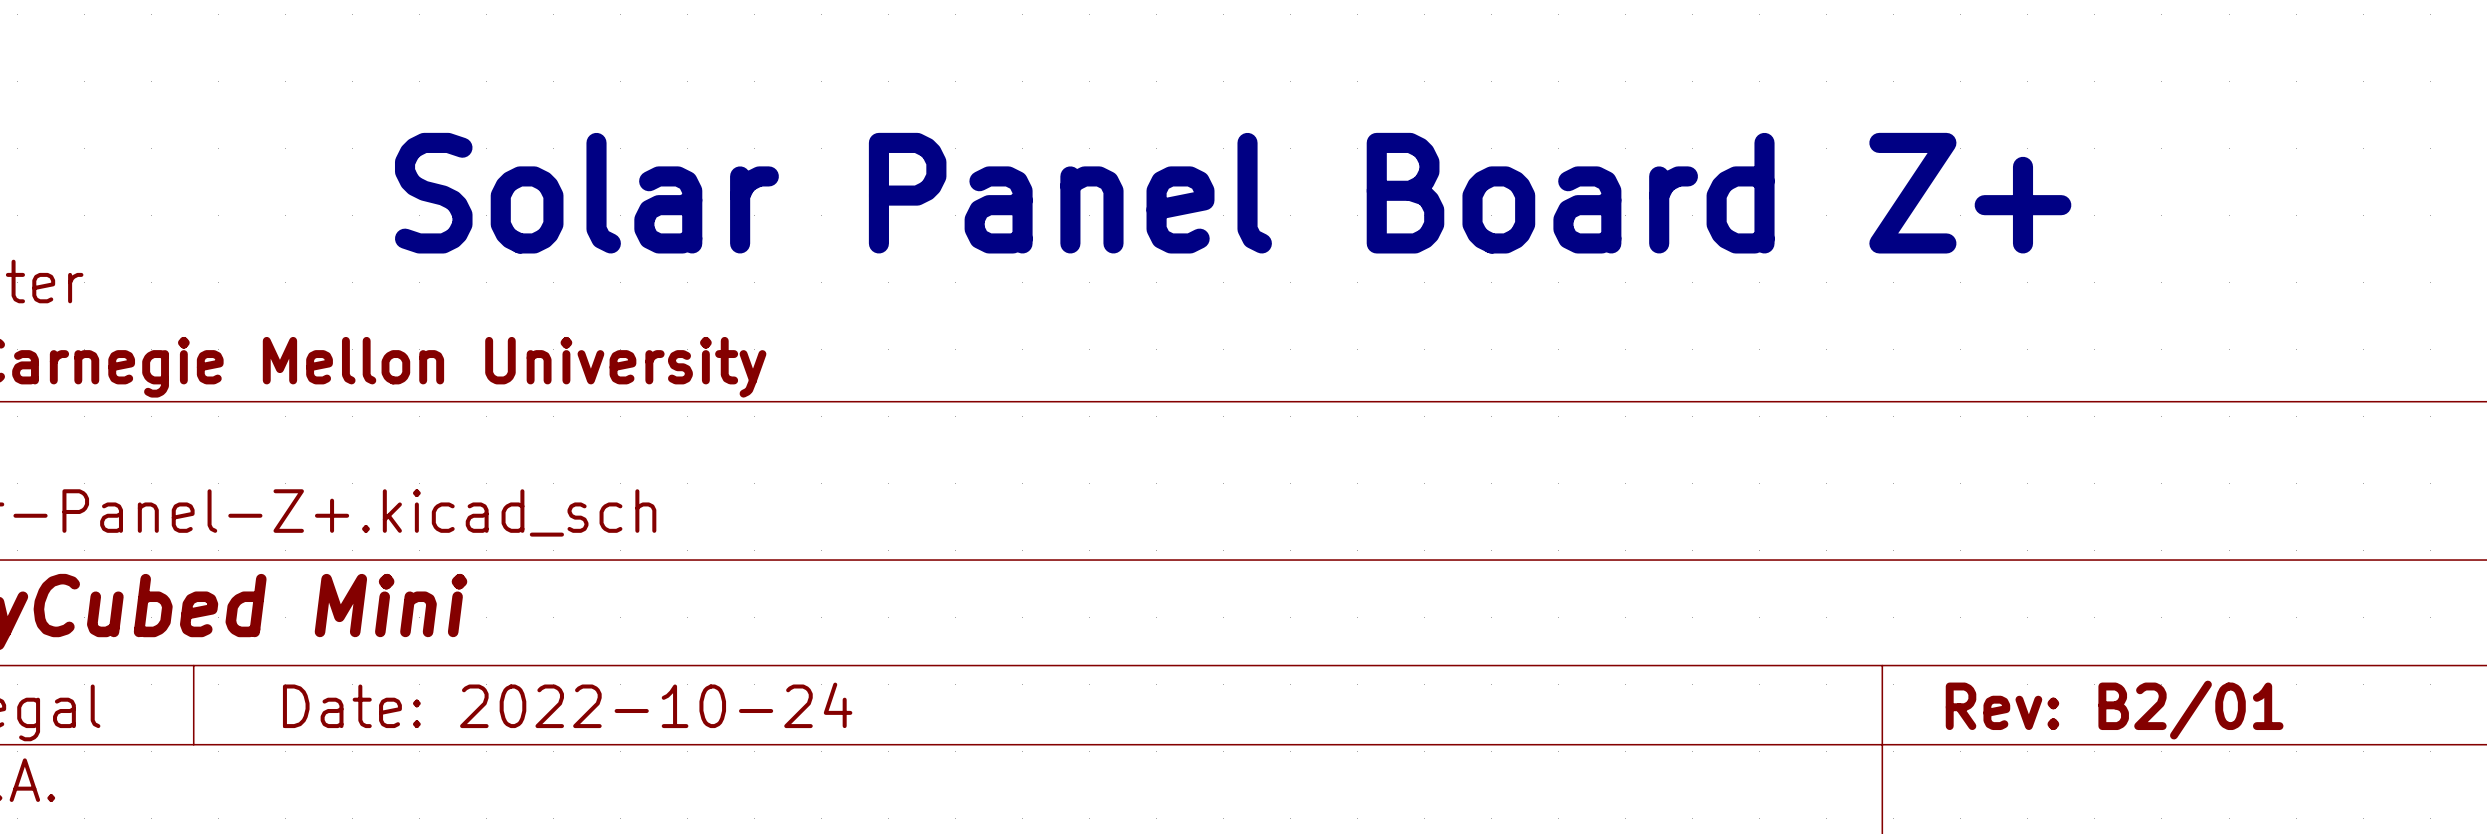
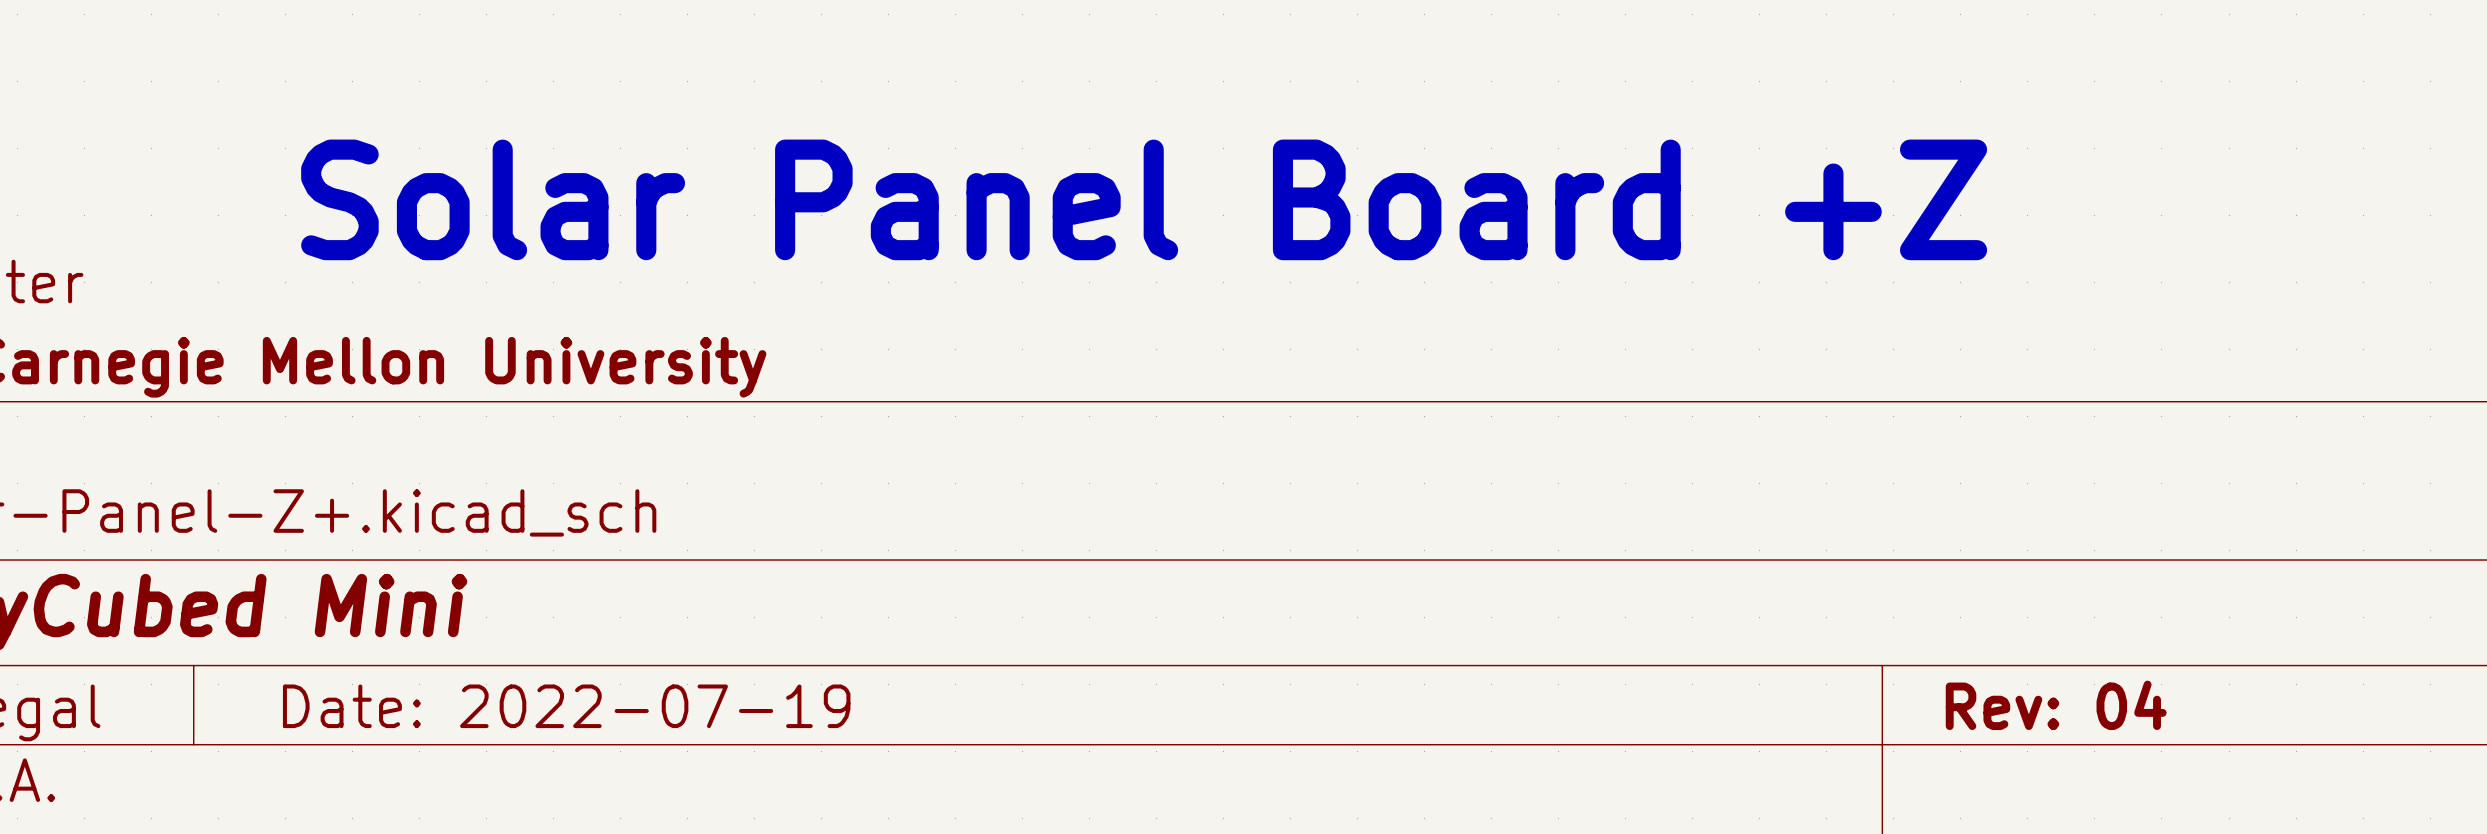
text: Solar Panel Board Z+ (1233, 193) -> Solar Panel Board +Z (1144, 199)
title block: Date: 2022-10-24 (567, 705) -> Date: 2022-07-19 (566, 706)
title block: Rev: B2/01 (2114, 710) -> Rev: 04 (2056, 705)

